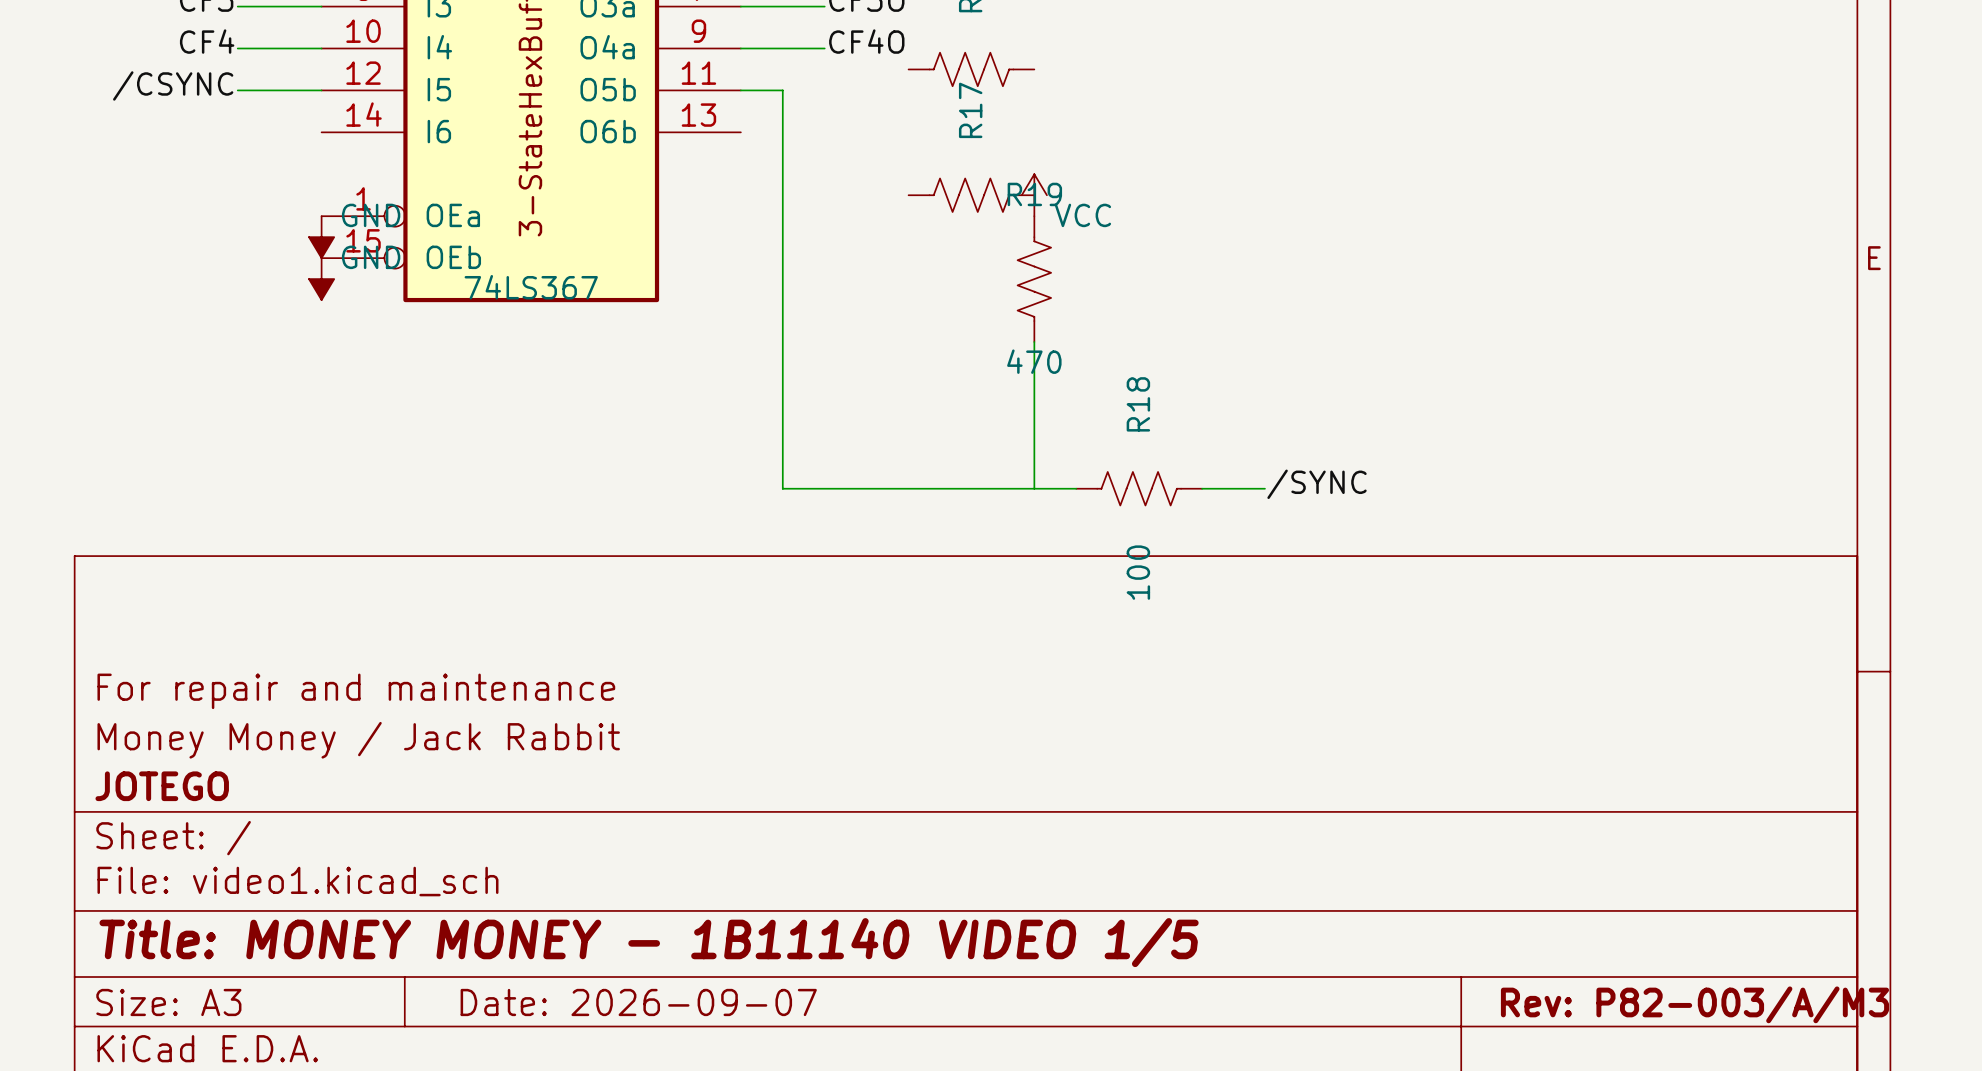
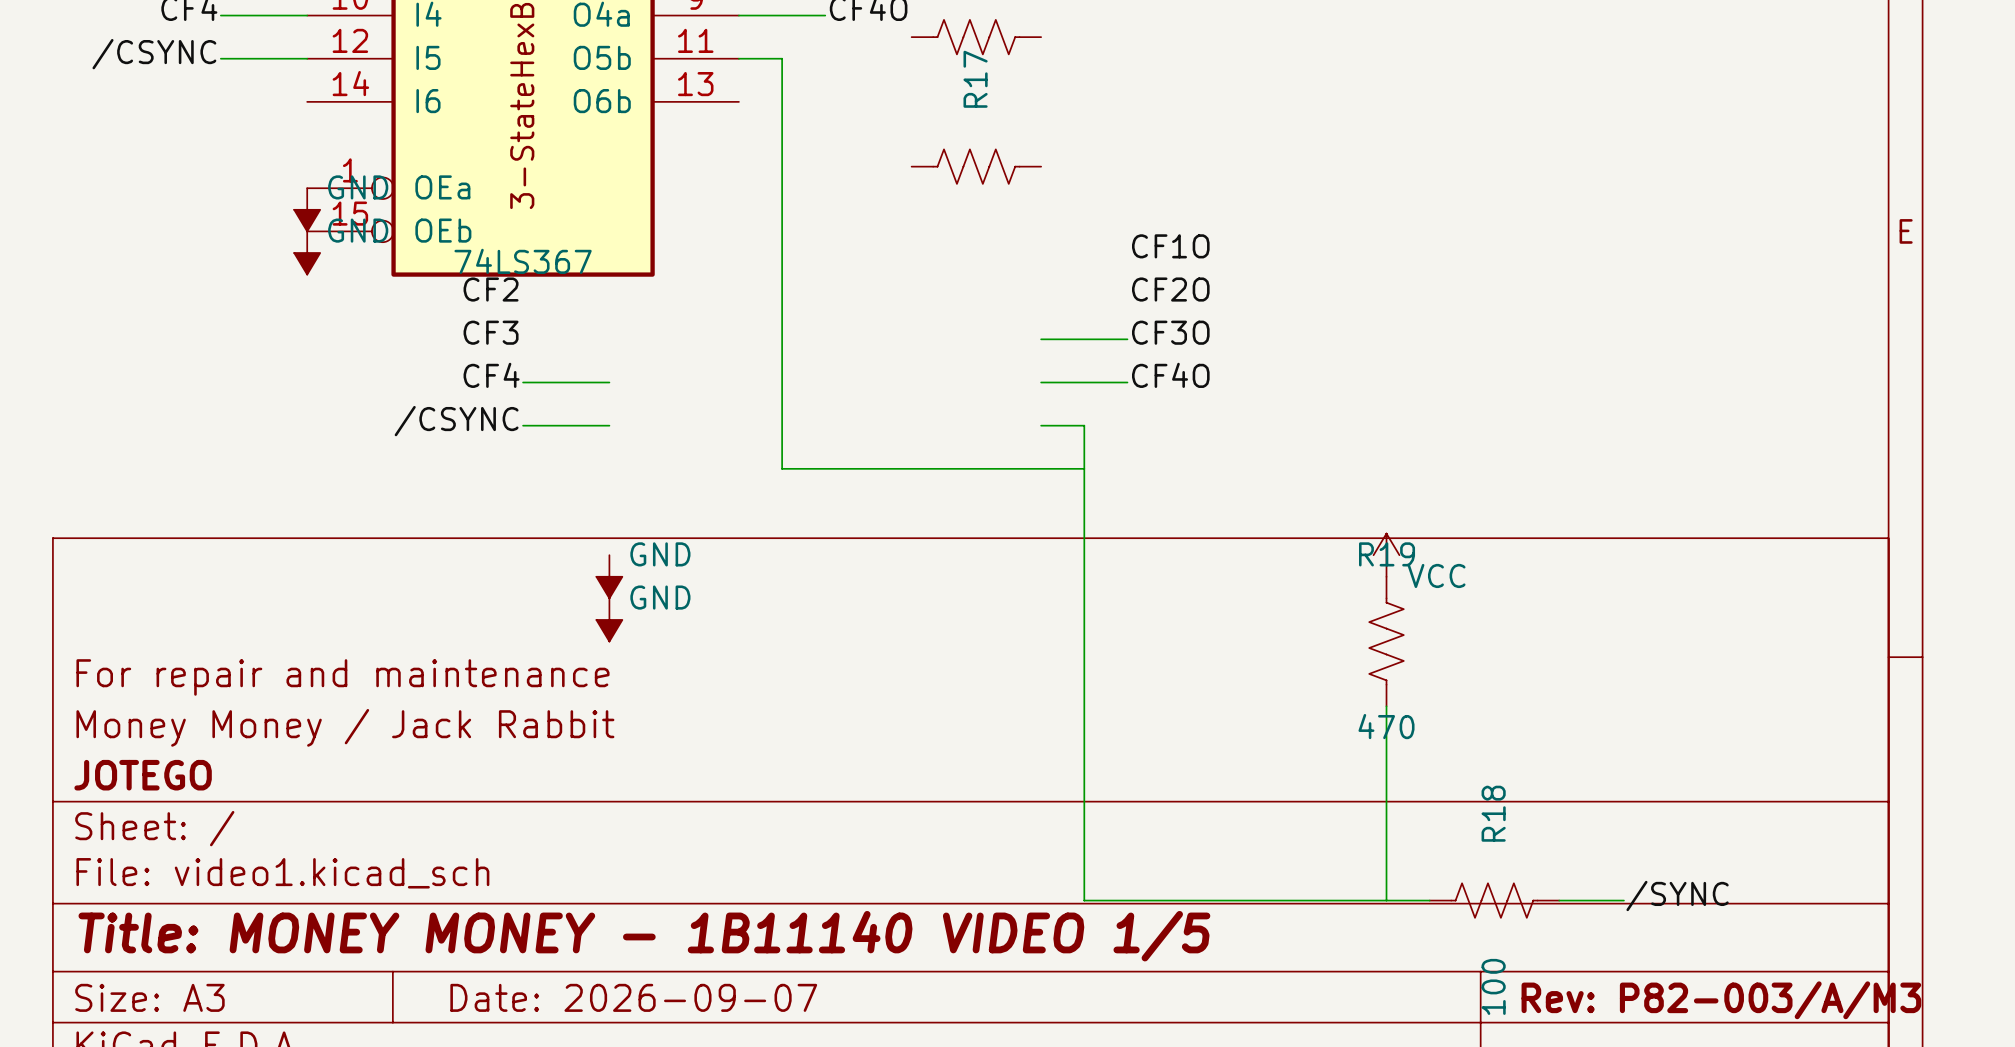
power symbol: VCC (1034, 195) -> none
label: none -> CF1O (1170, 246)
R19 position: (1034, 279) -> (1386, 641)
label: none -> CF2 (491, 289)
label: none -> CF2O (1170, 289)
wire: (1034, 341) (1034, 488) -> none
label: none -> CF3 (491, 332)
label: none -> CF3O (1170, 332)
wire: none -> (1041, 339) (1127, 339)
label: none -> CF4 (491, 375)
label: none -> CF4O (1170, 375)
wire: none -> (523, 382) (609, 382)
wire: none -> (1041, 382) (1127, 382)
label: none -> /CSYNC (456, 421)
wire: none -> (523, 425) (609, 425)
wire: none -> (1041, 425) (1084, 425) (1084, 900) (1429, 900)
label: /SYNC (1317, 484) -> none
R18 position: (1139, 488) -> (1494, 900)
wire: (1202, 488) (1264, 488) -> none
power symbol: none -> VCC (1386, 555)
power symbol: none -> GND (609, 576)
power symbol: none -> GND (609, 619)
wire: none -> (1386, 706) (1386, 900)
label: none -> /SYNC (1677, 895)
wire: none -> (1559, 900) (1623, 900)

